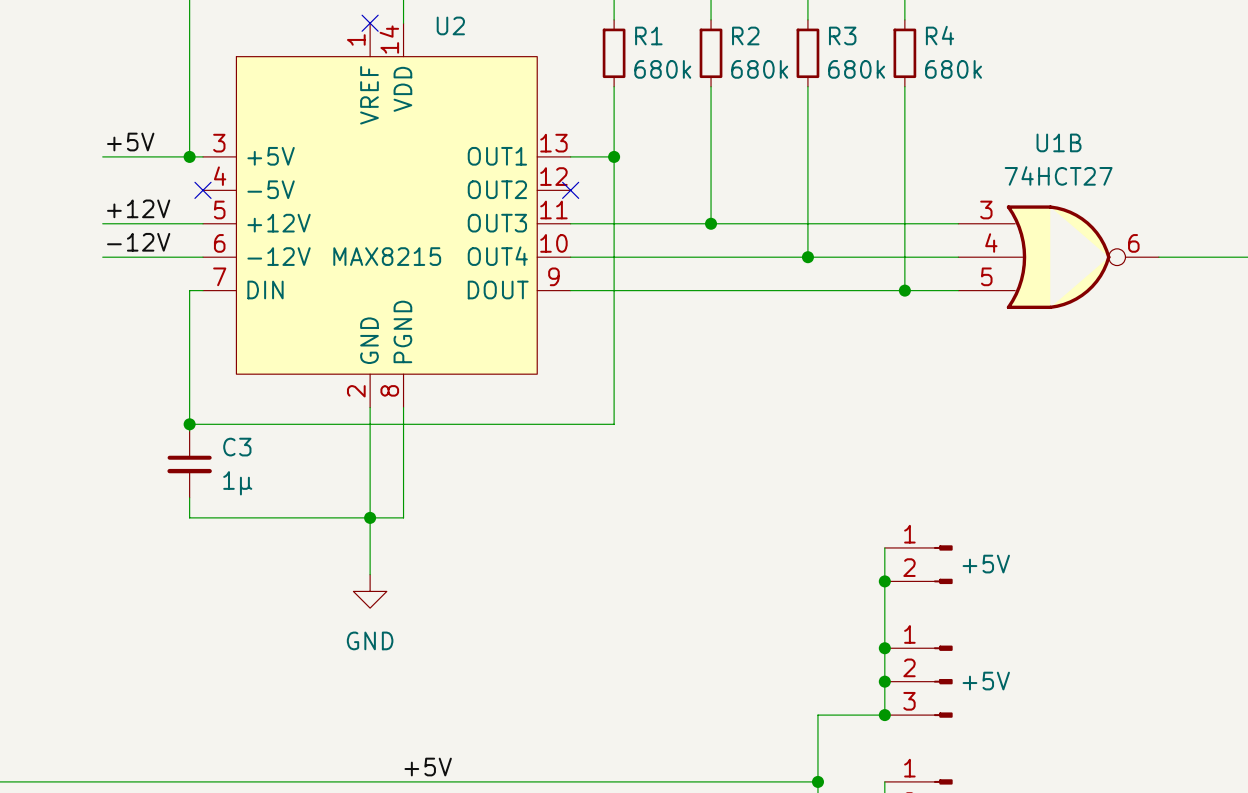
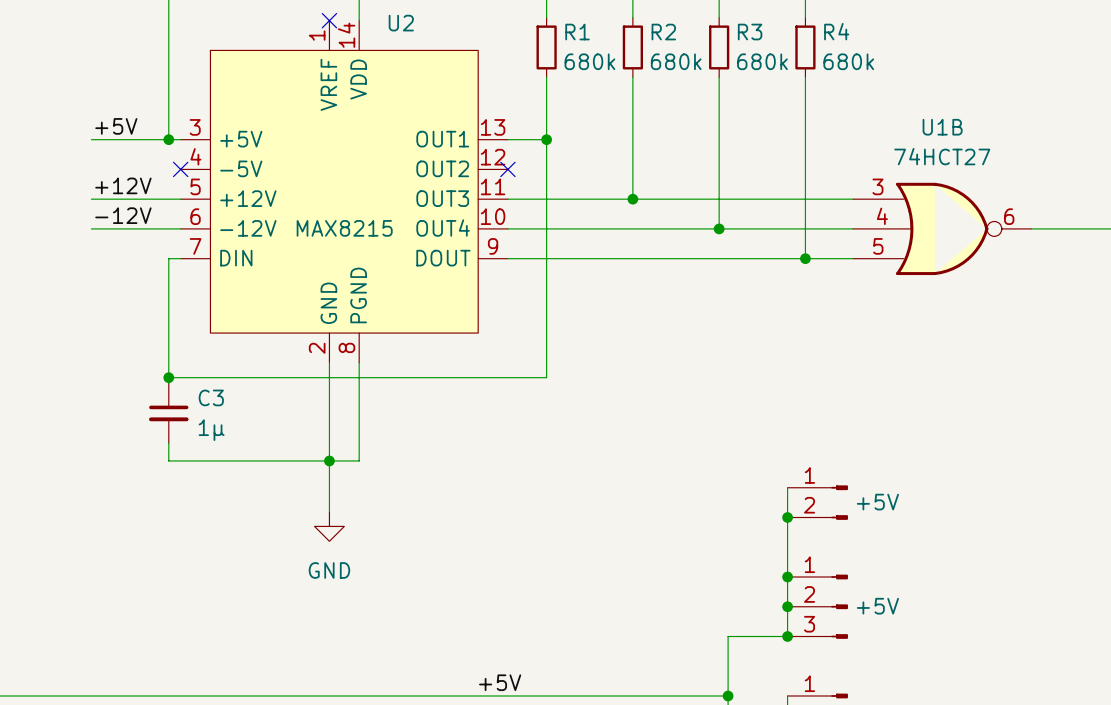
label position: +5V (428, 767) -> +5V (500, 682)

